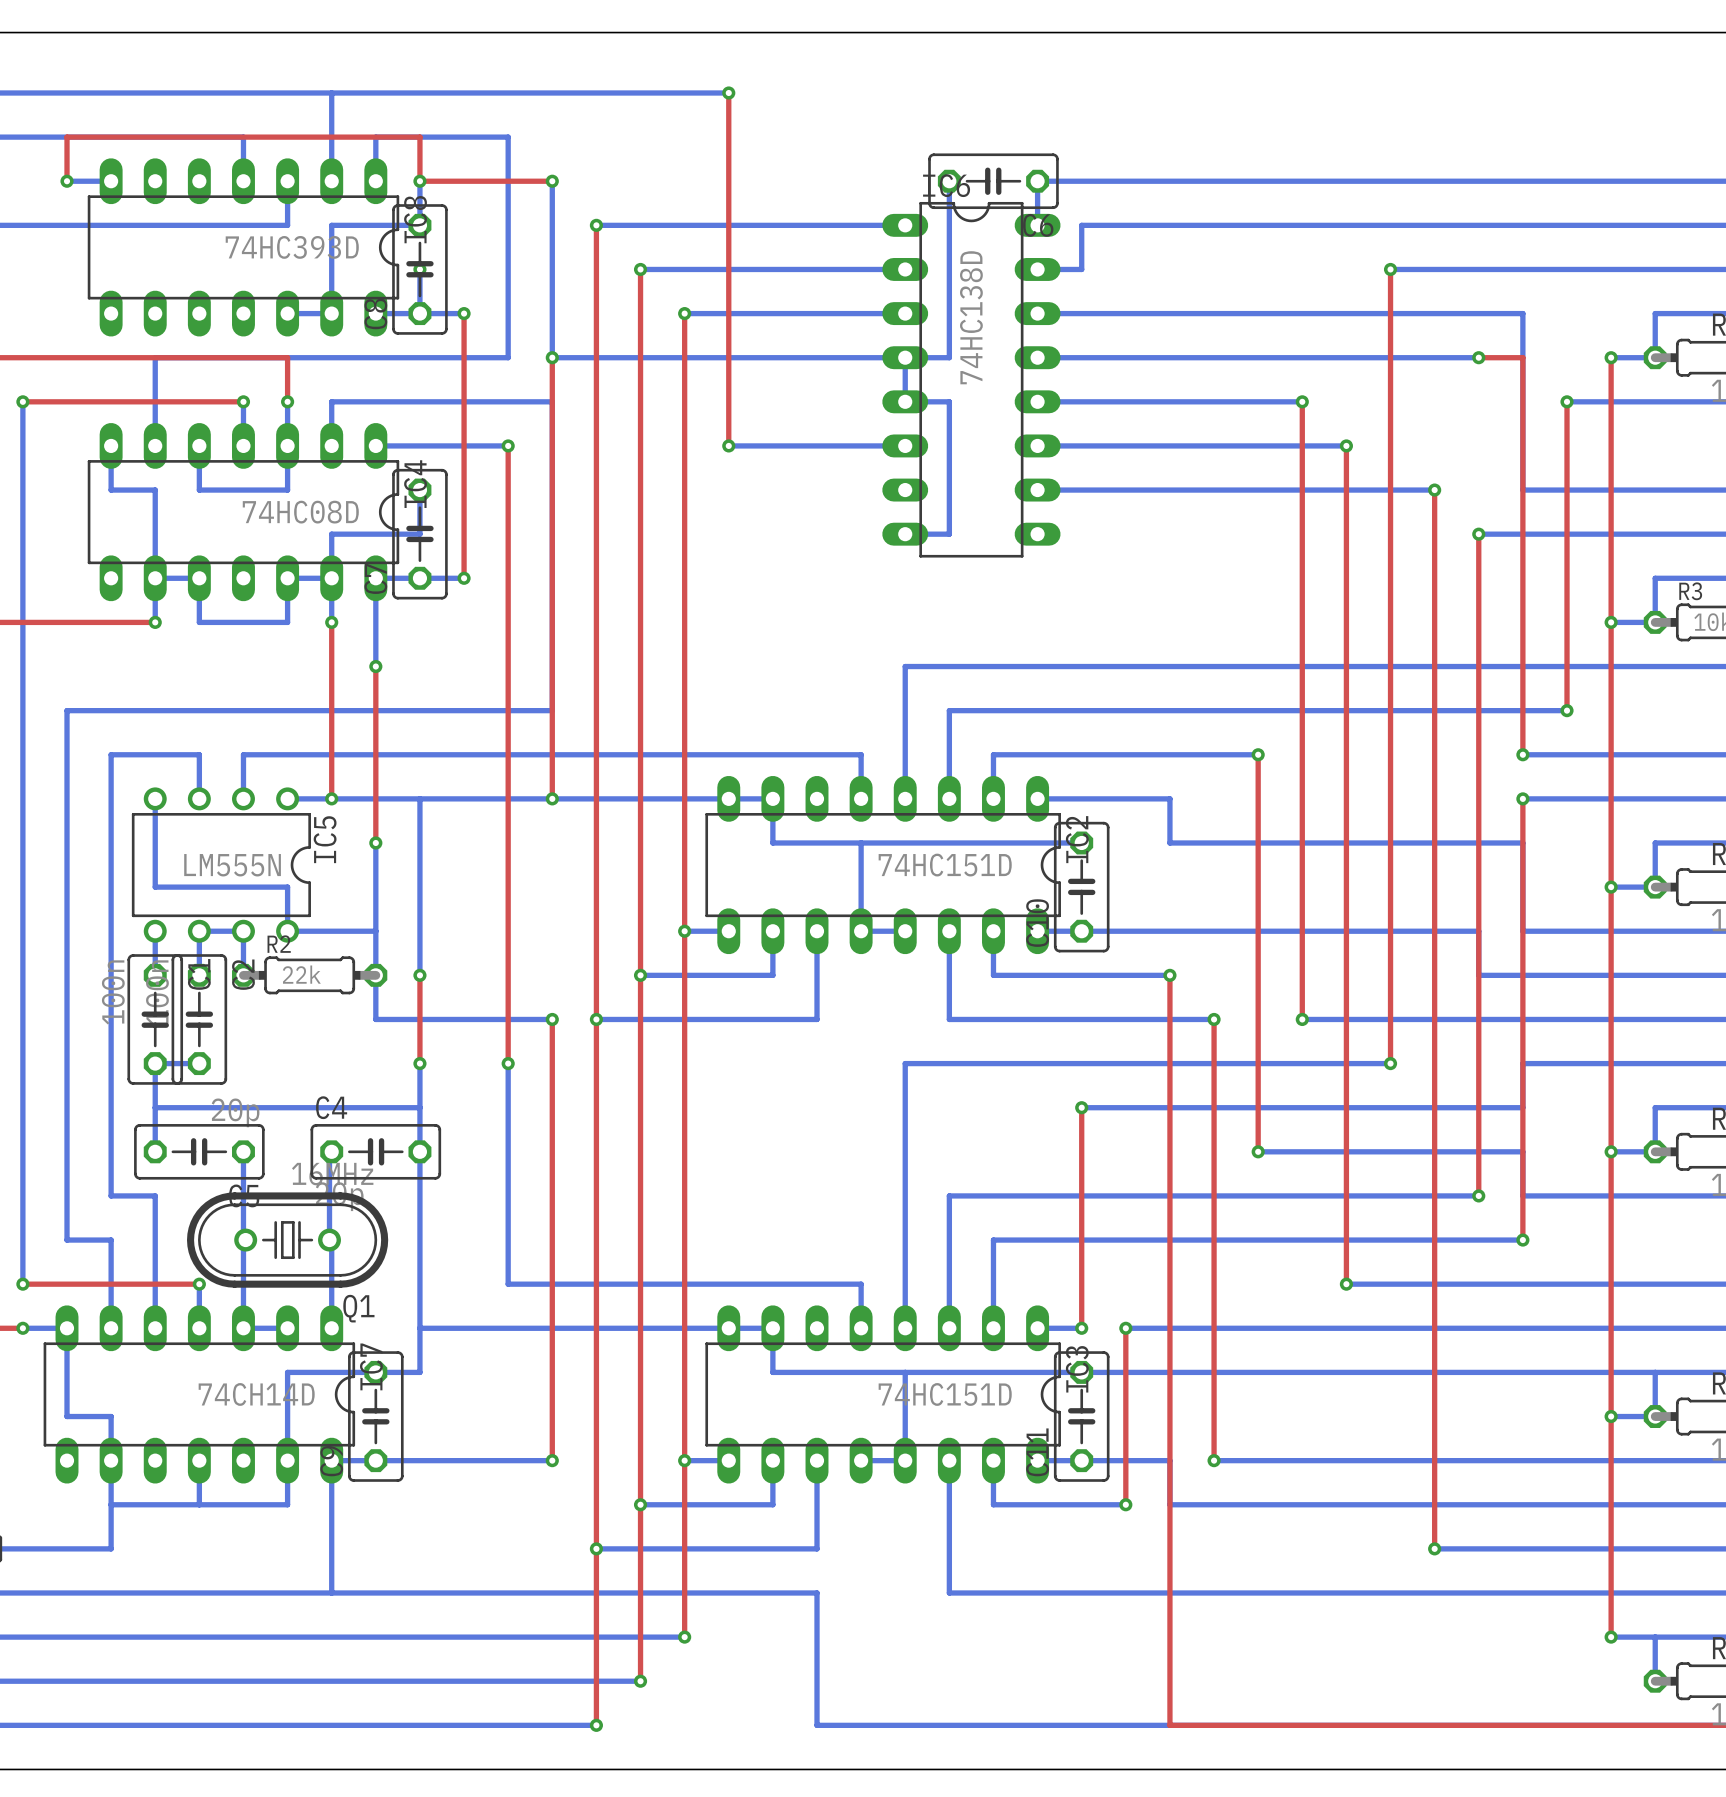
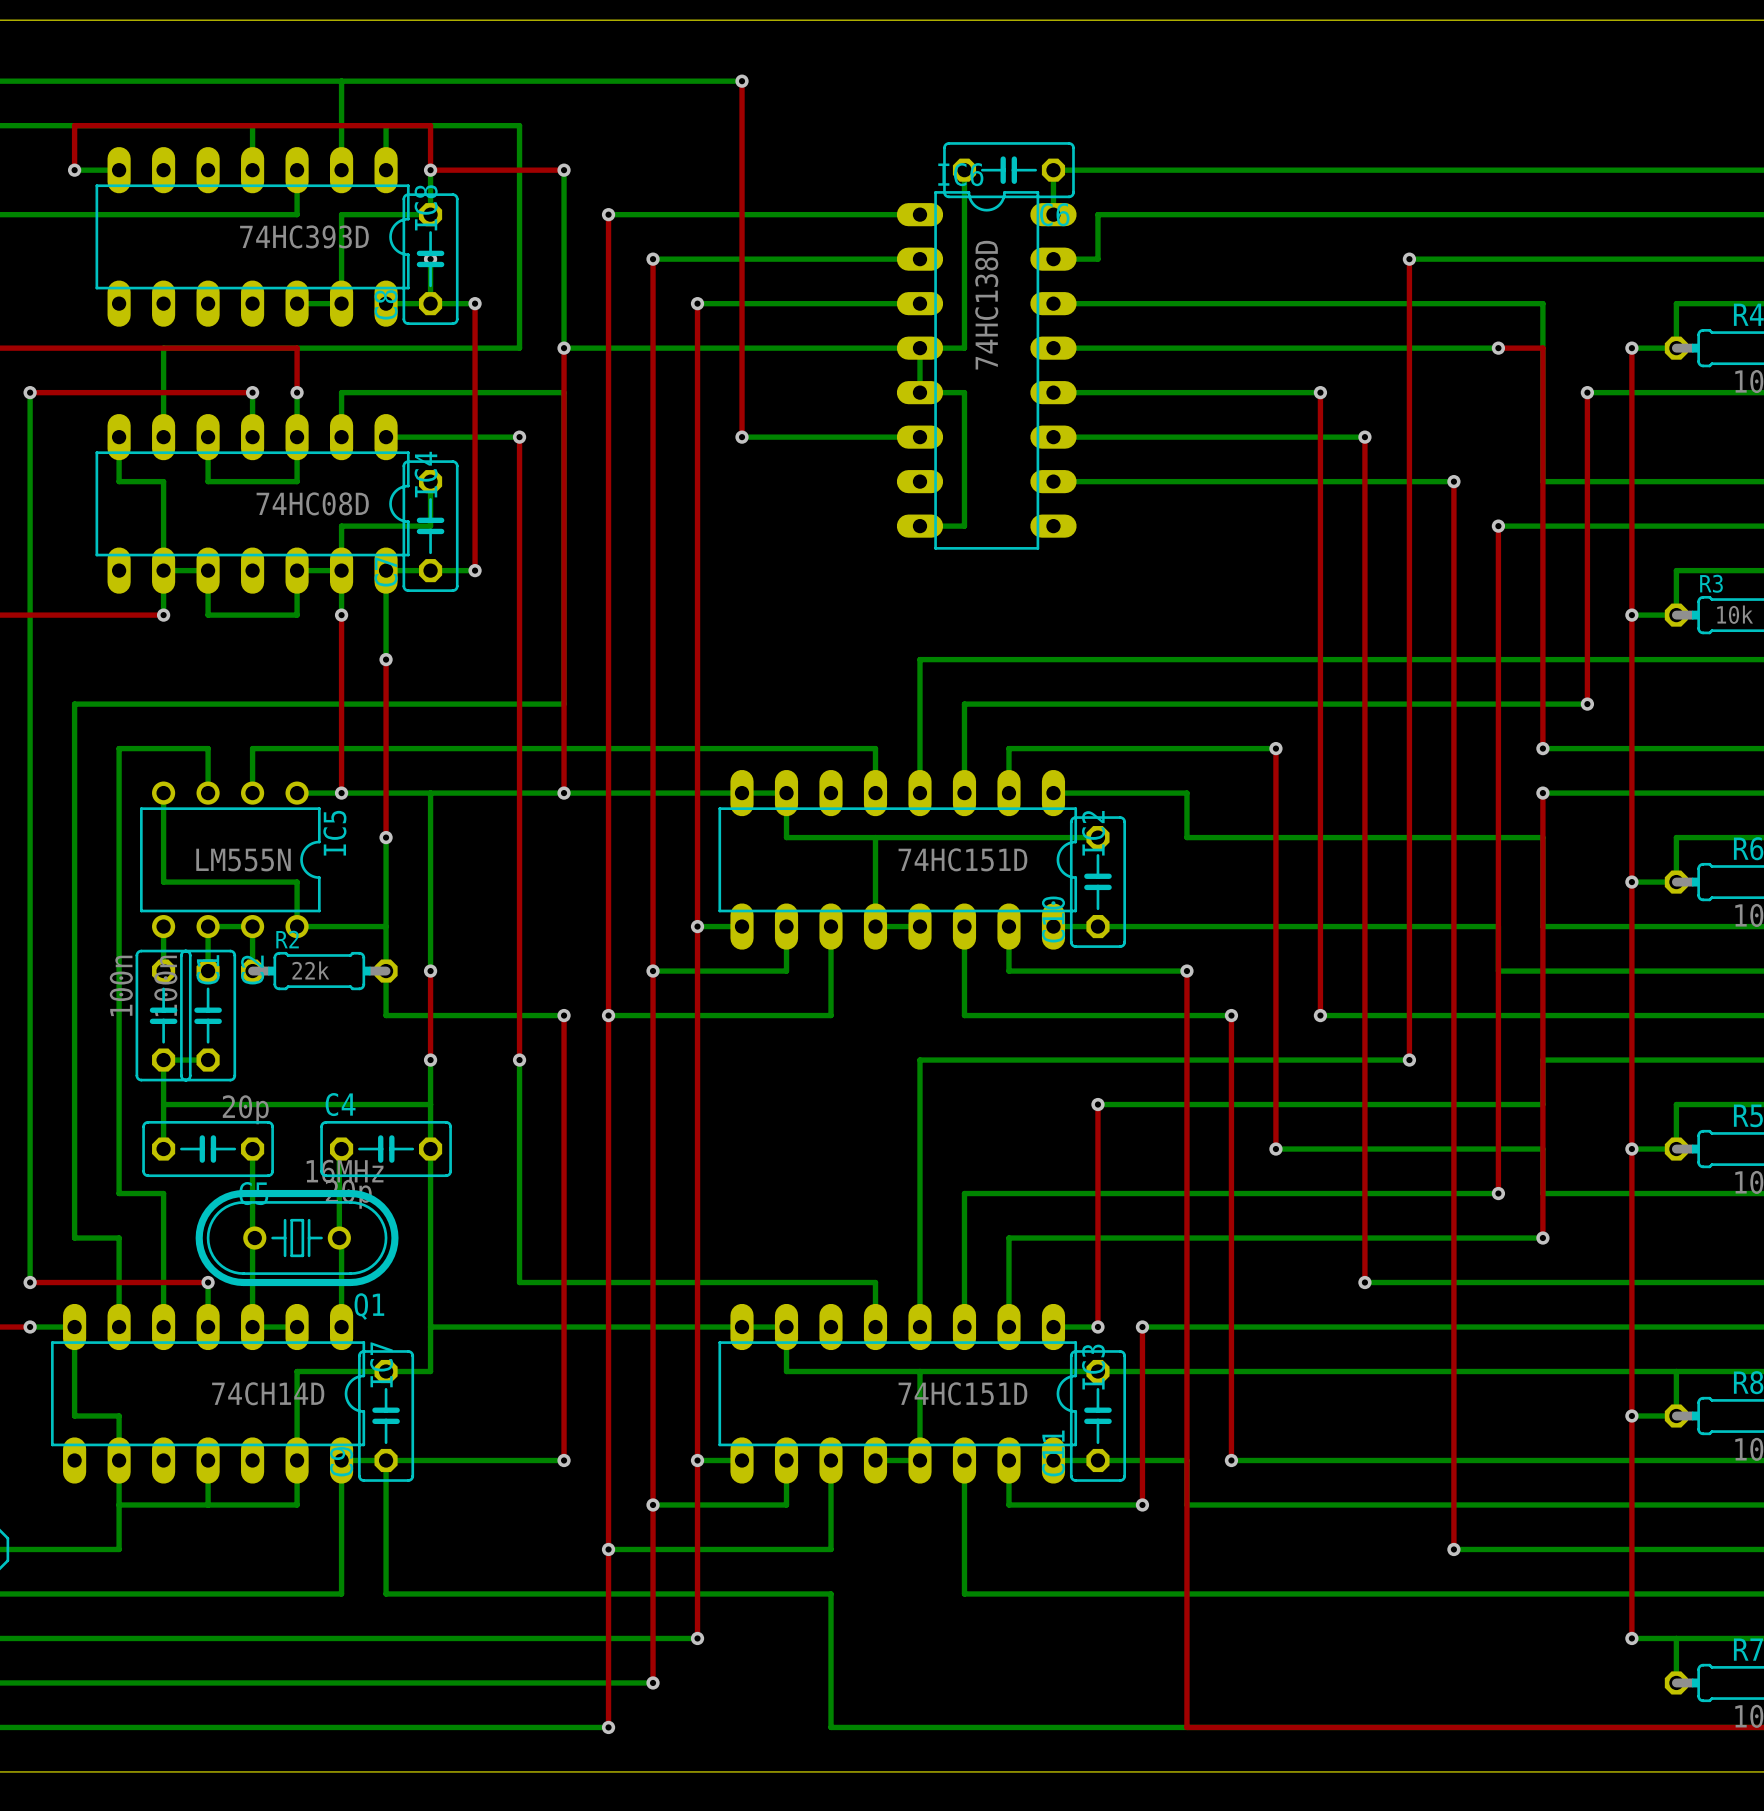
bottom track: (331, 1592) (375, 1592) -> (386, 1460) (386, 1593)

